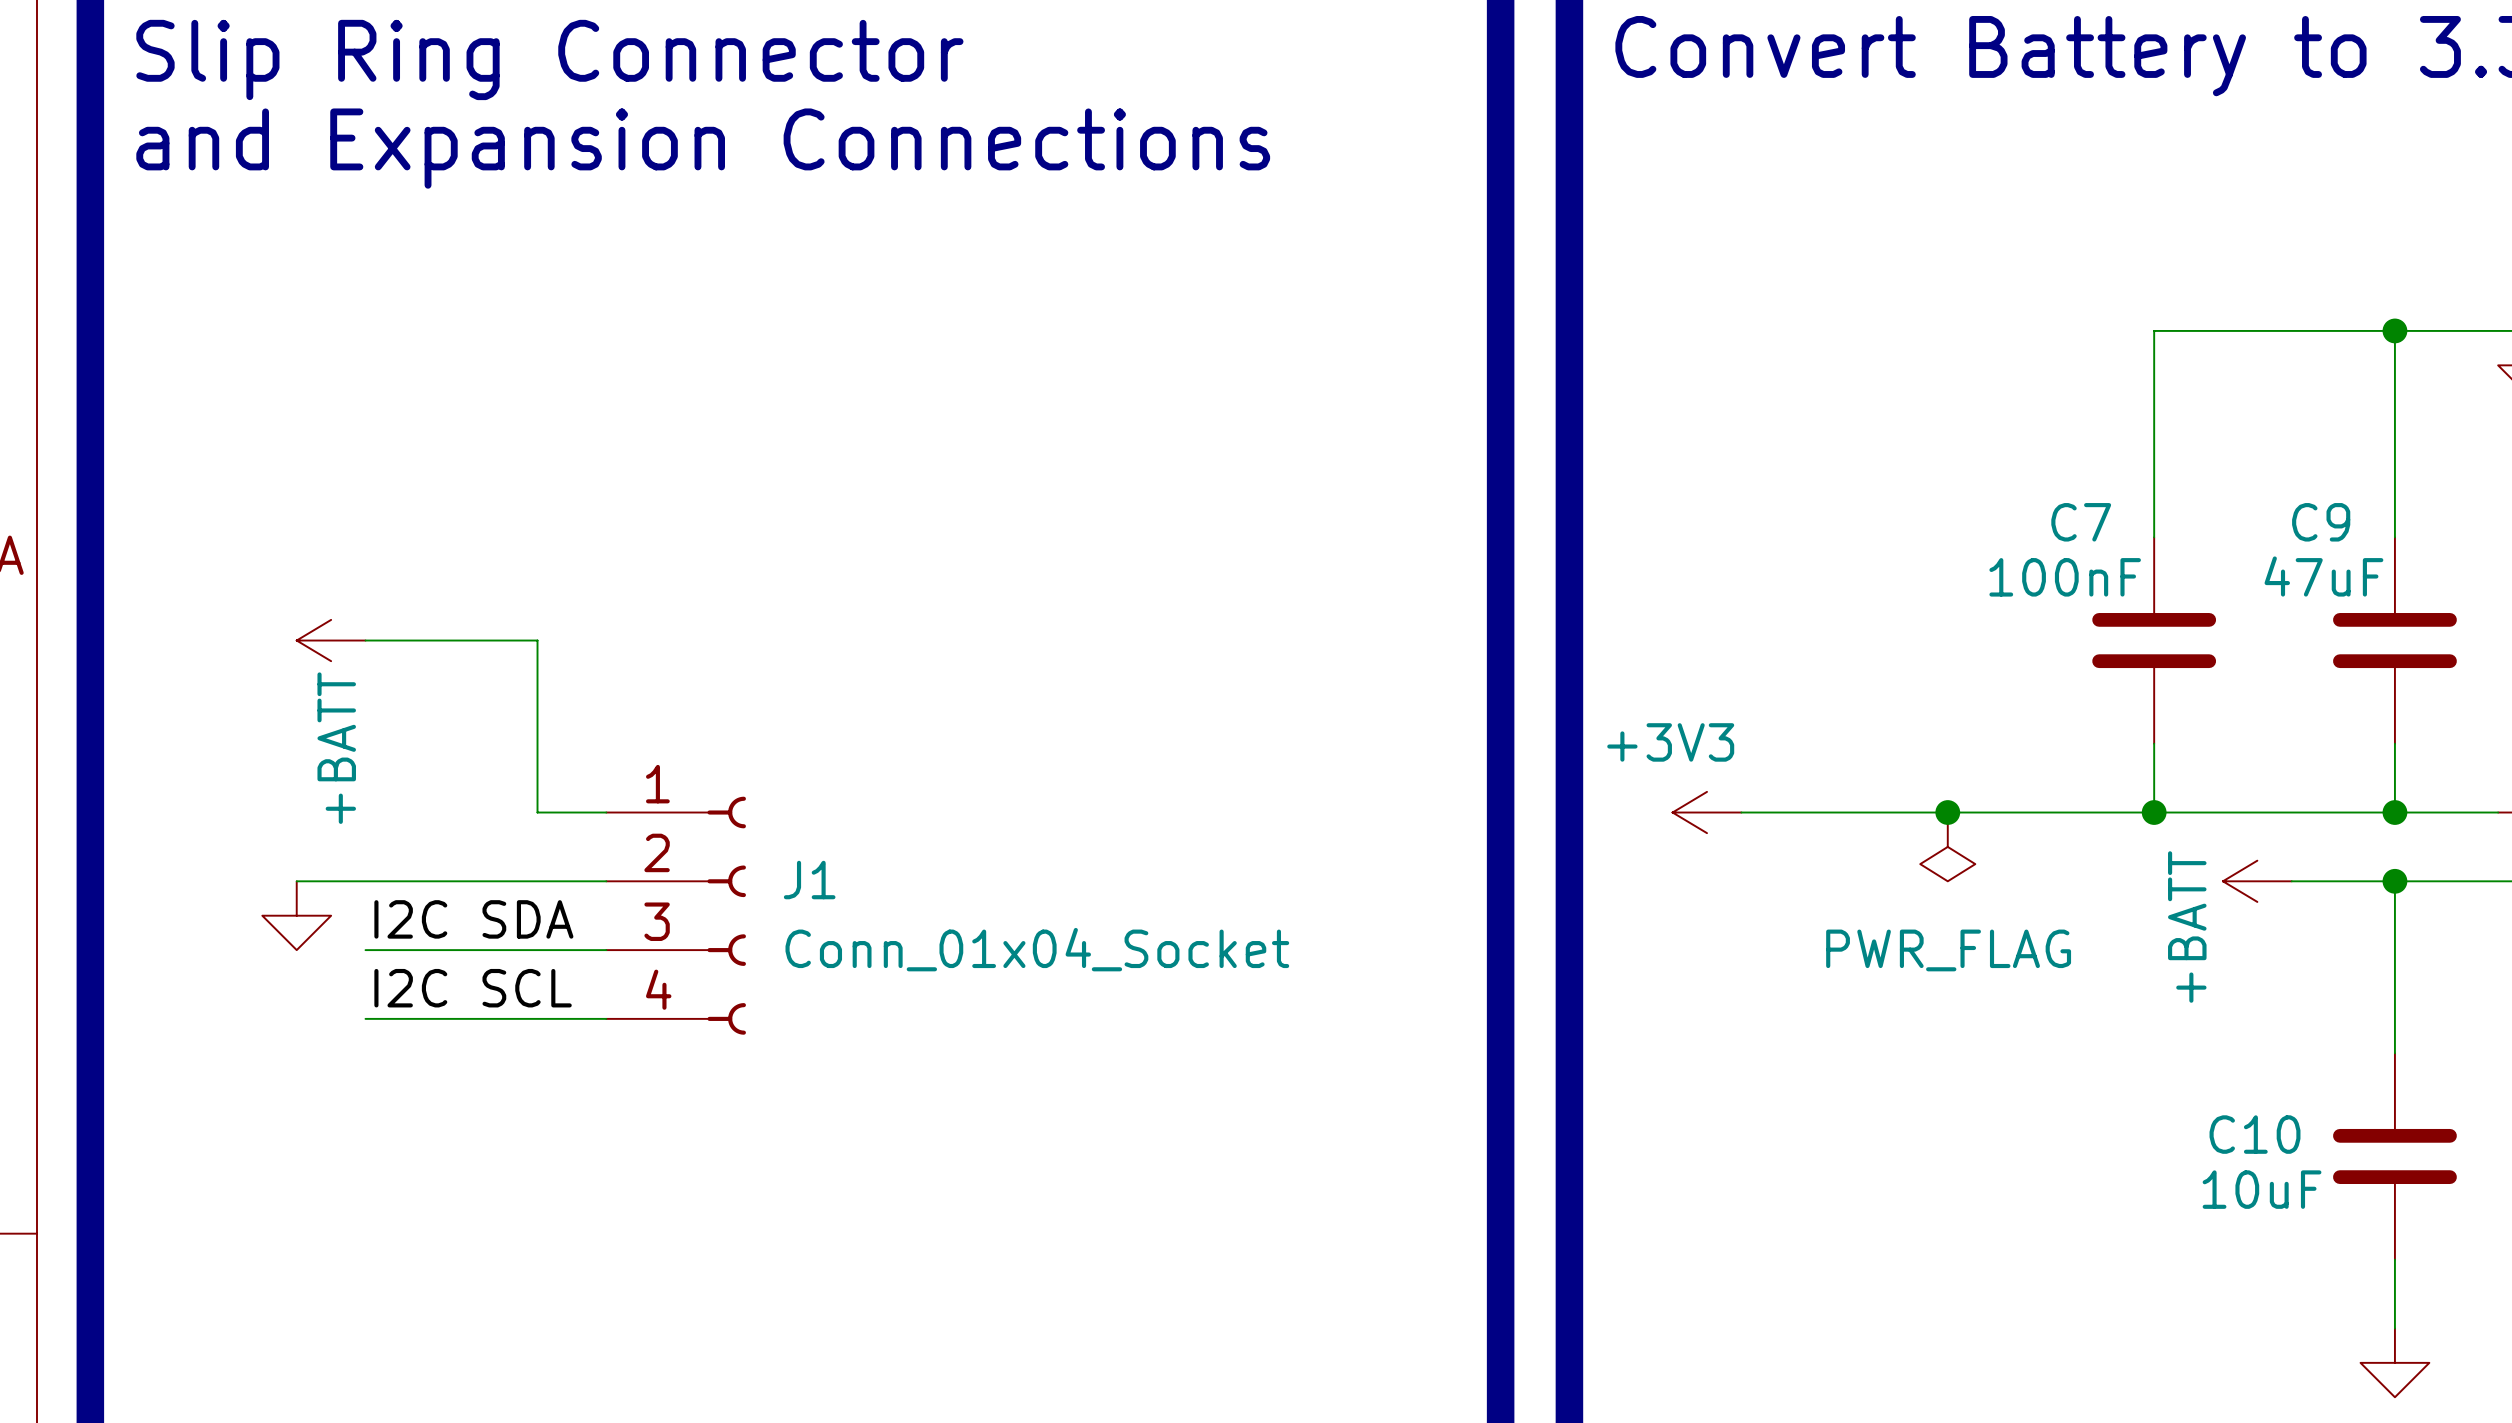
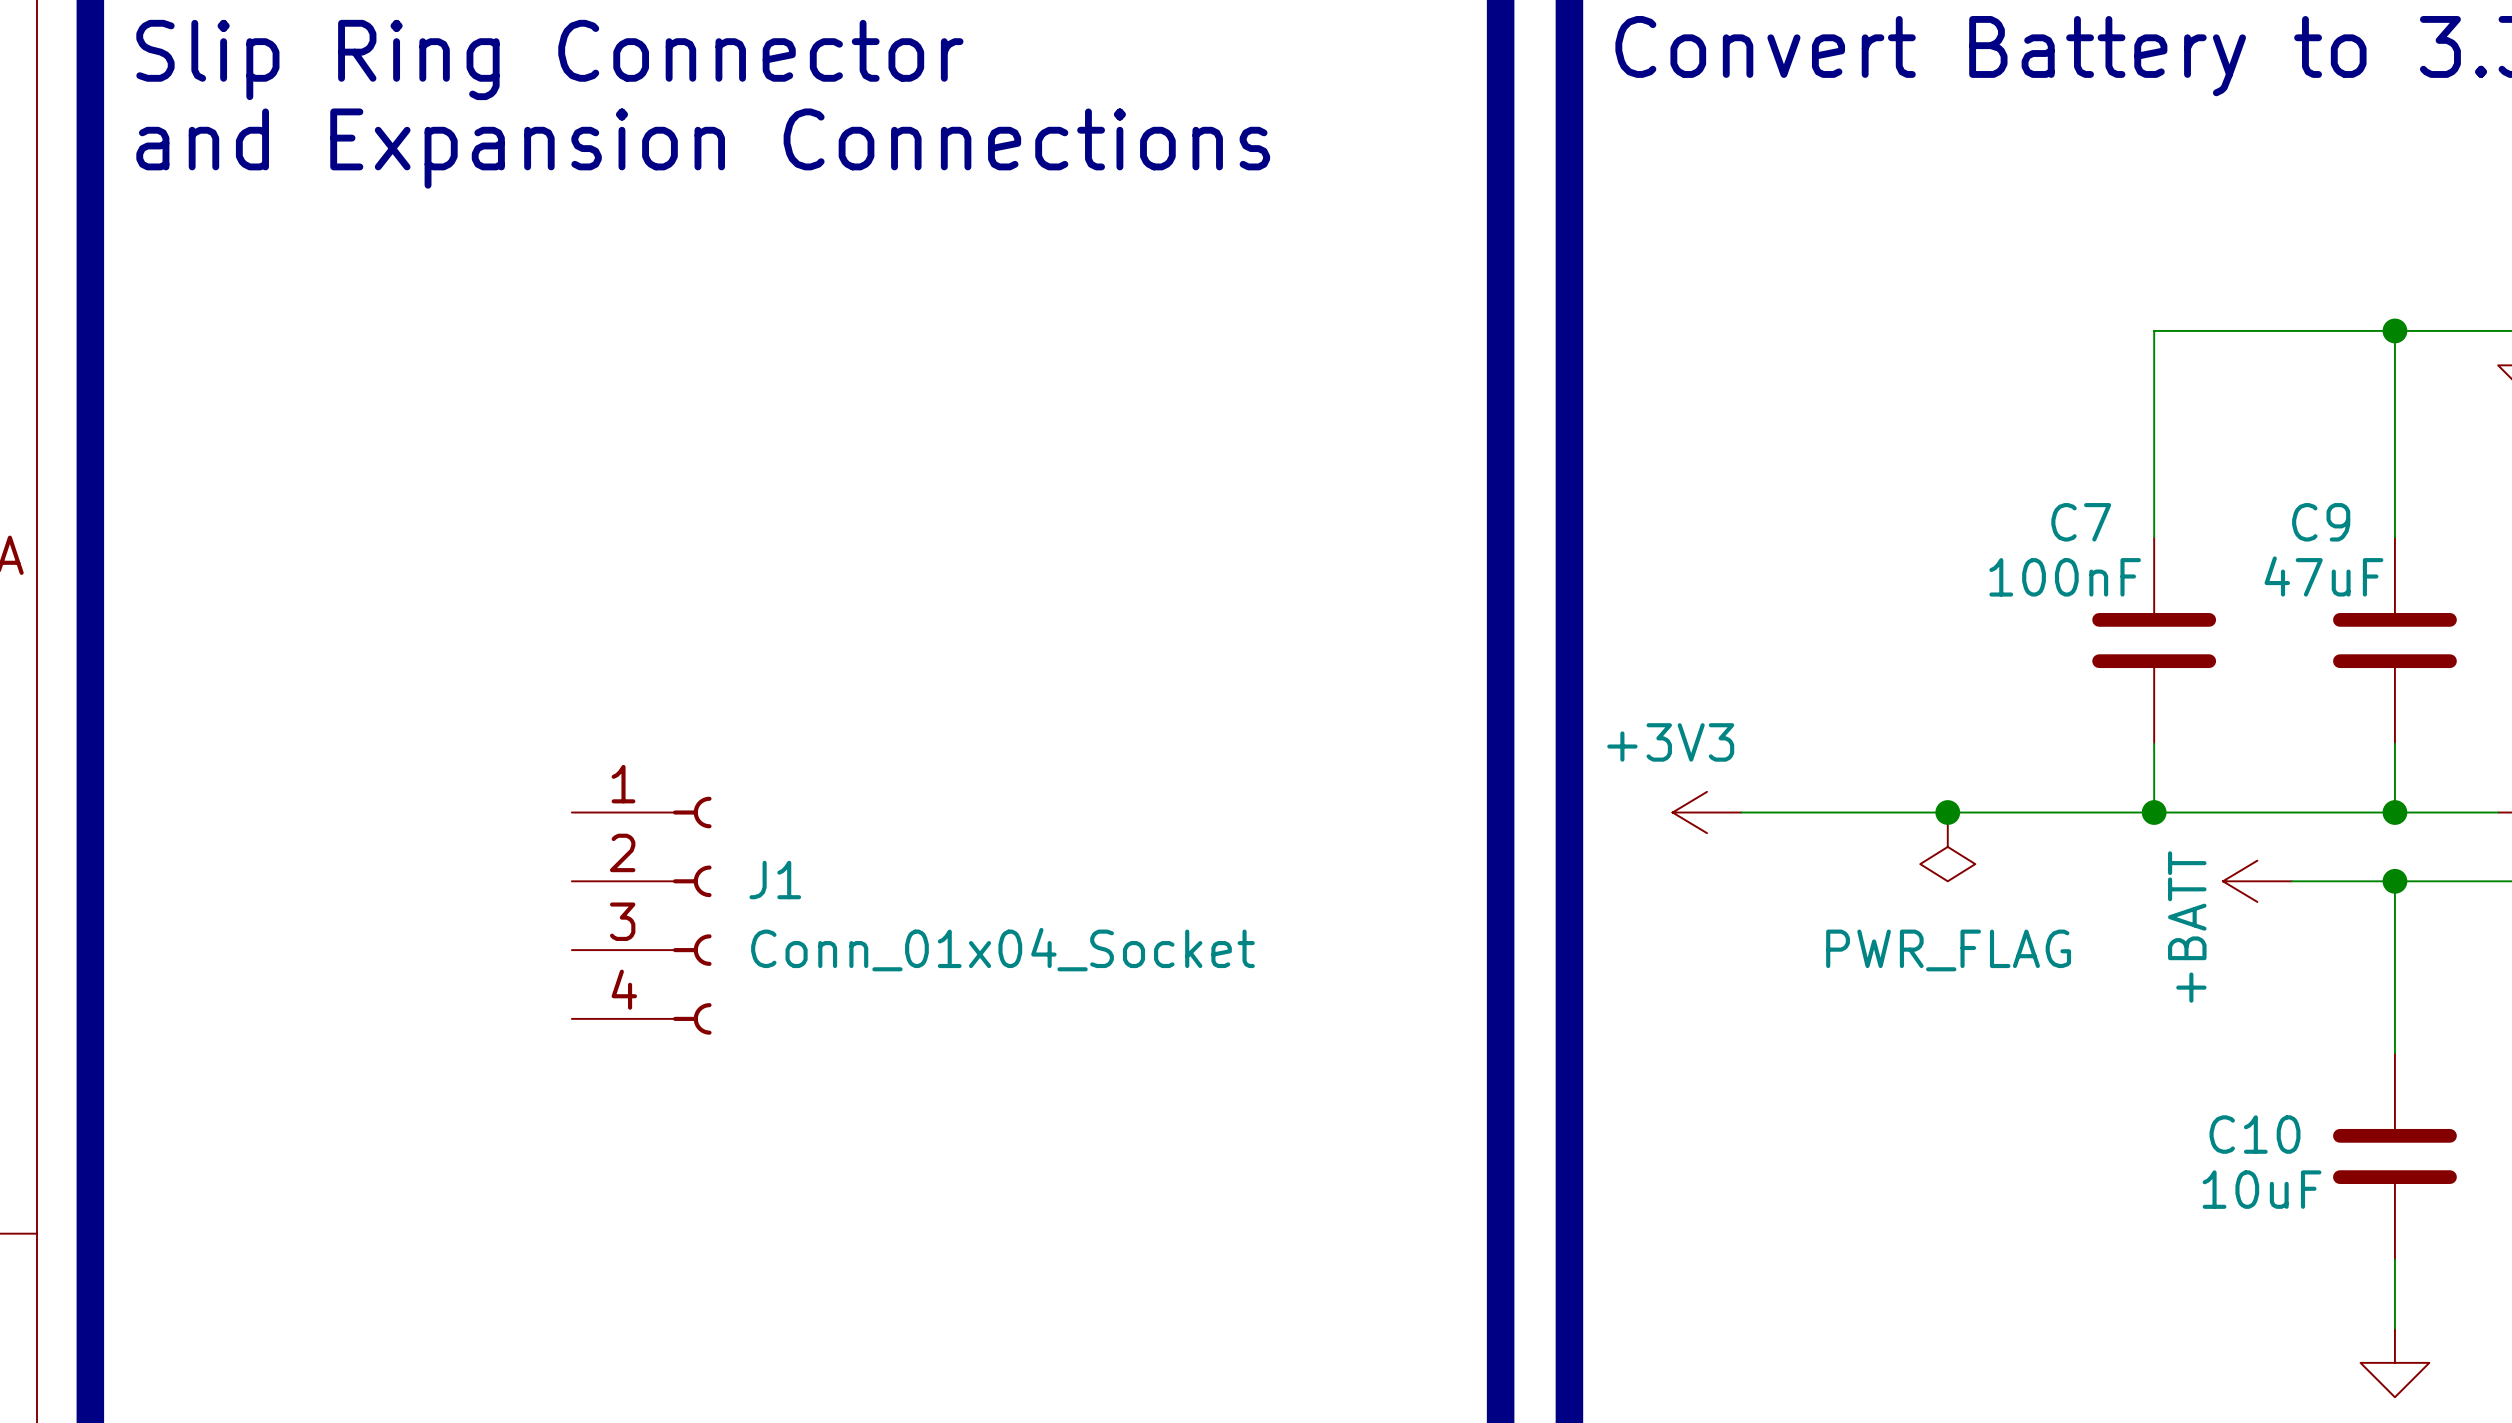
power symbol: +BATT (331, 640) -> none
wire: (365, 640) (537, 640) (537, 812) (606, 812) -> none
wire: (296, 881) (606, 881) -> none
power symbol: (296, 915) -> none
J1 position: (676, 915) -> (641, 915)
label: I2C SDA (473, 919) -> none
wire: (365, 950) (606, 950) -> none
label: I2C SCL (473, 988) -> none
wire: (365, 1018) (606, 1018) -> none

